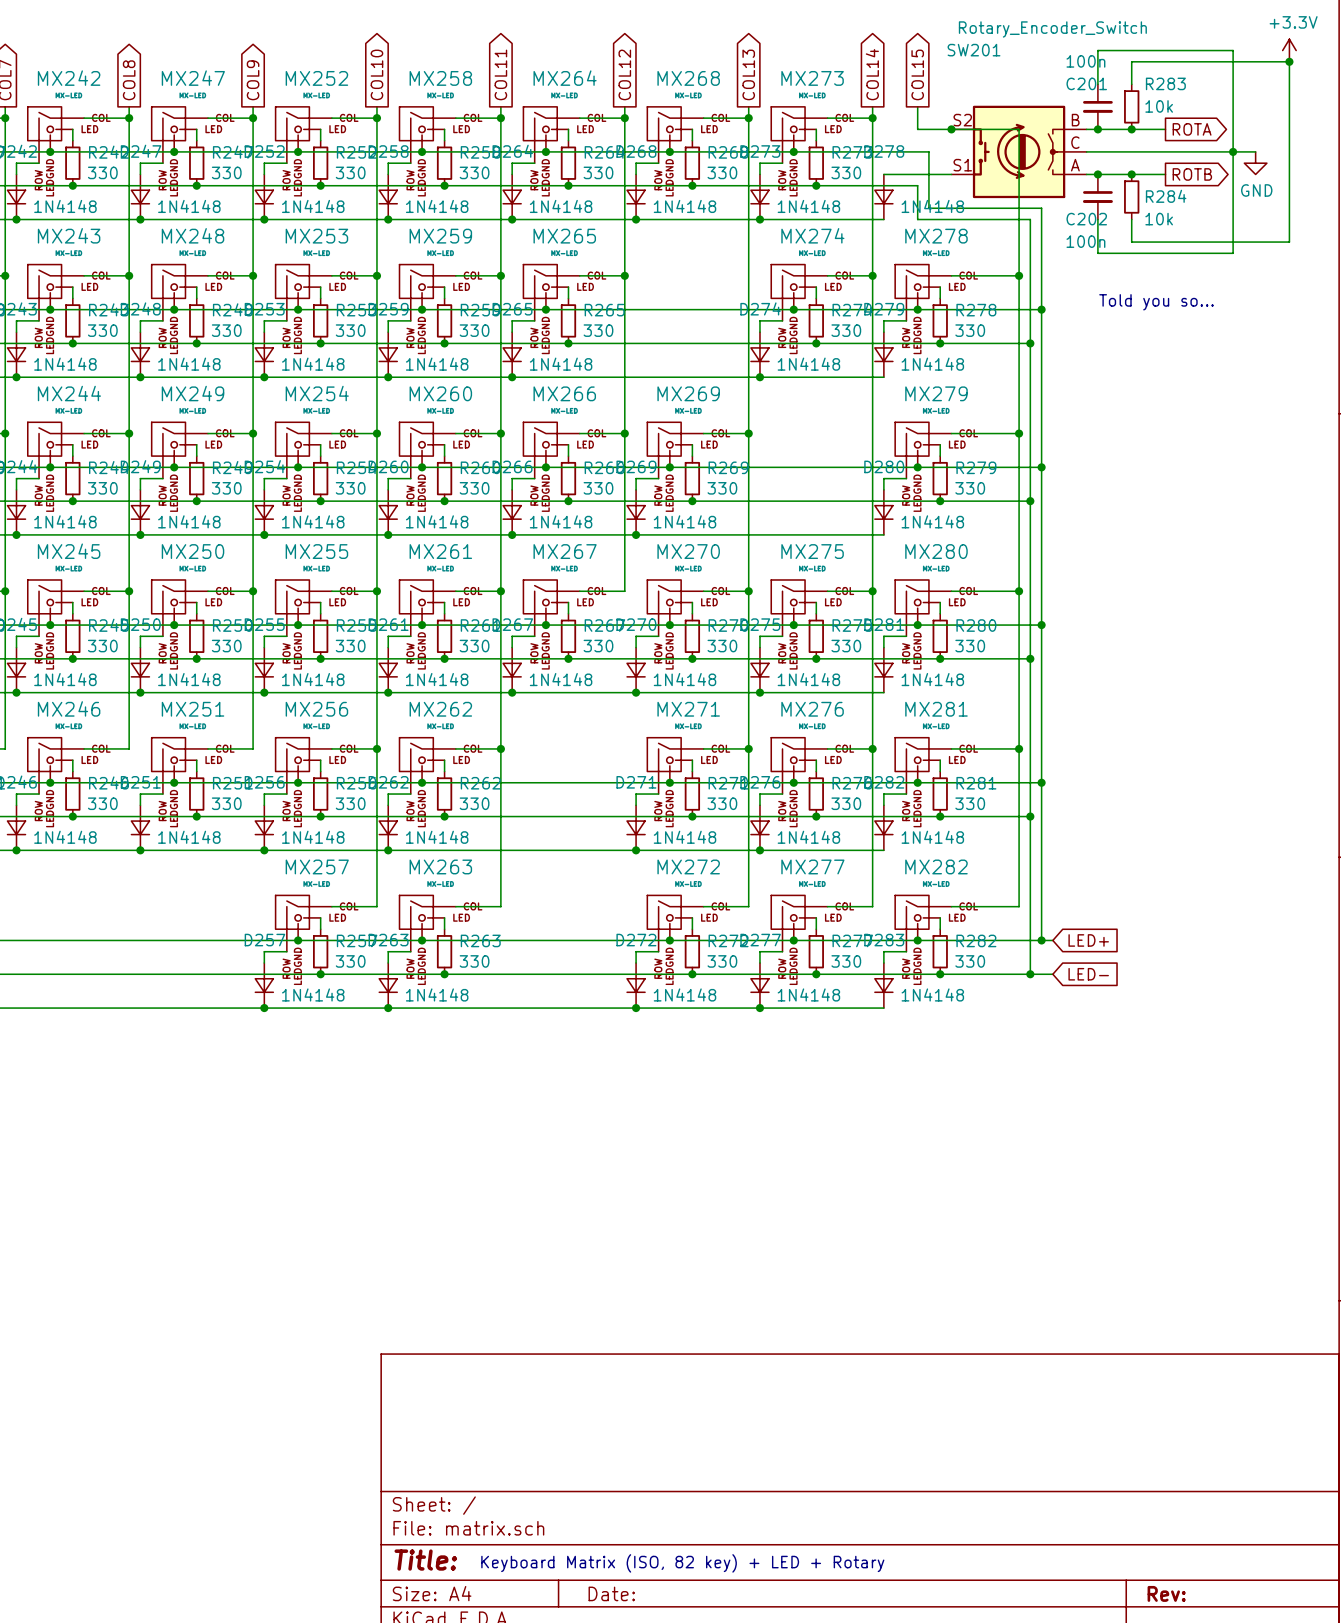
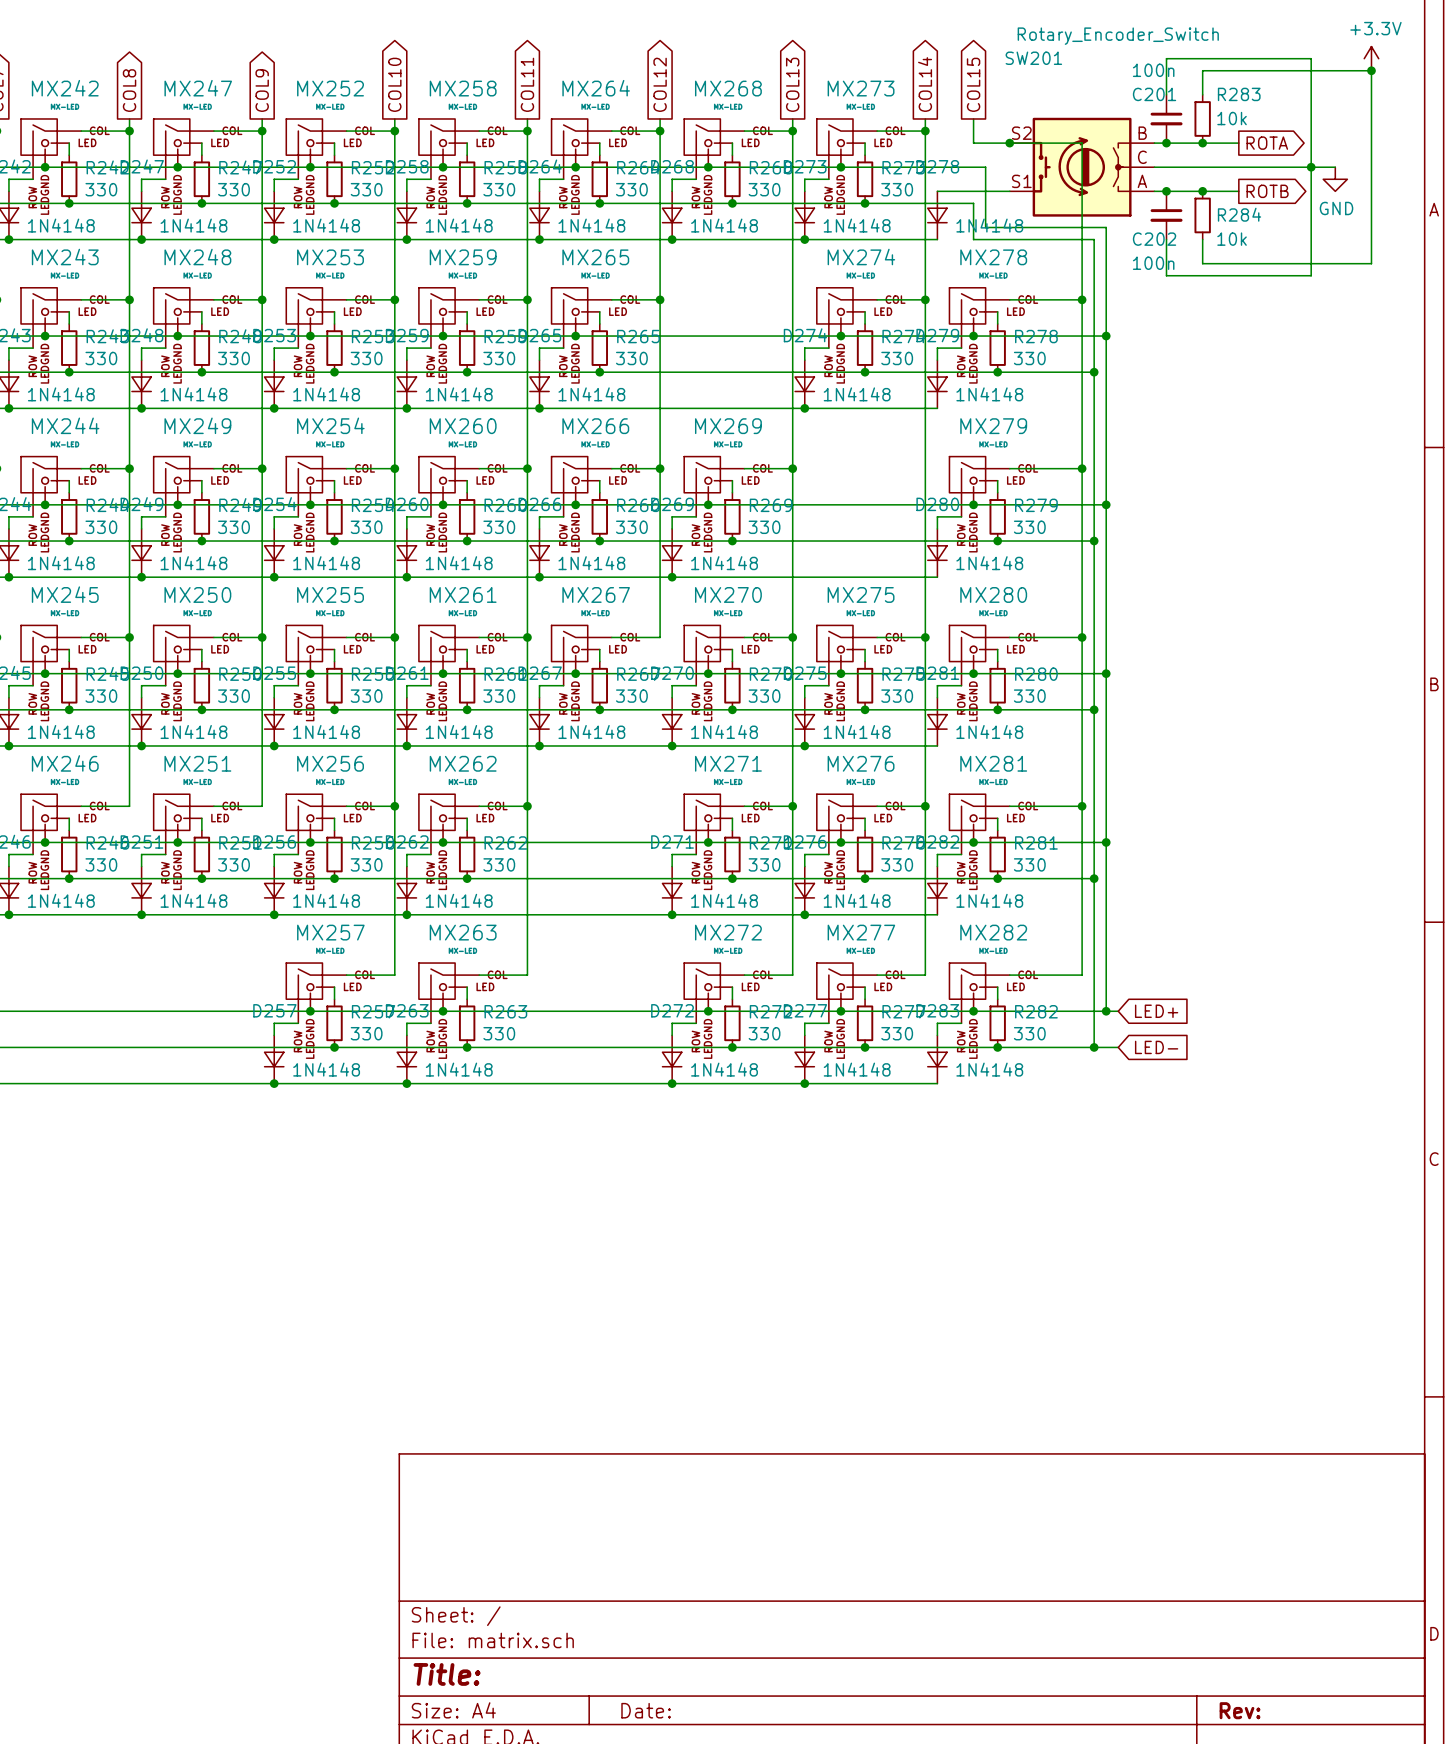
text: Told you so... (1156, 302) -> none
text: Keyboard Matrix (ISO, 82 key) + LED + Rotary (682, 1563) -> none

